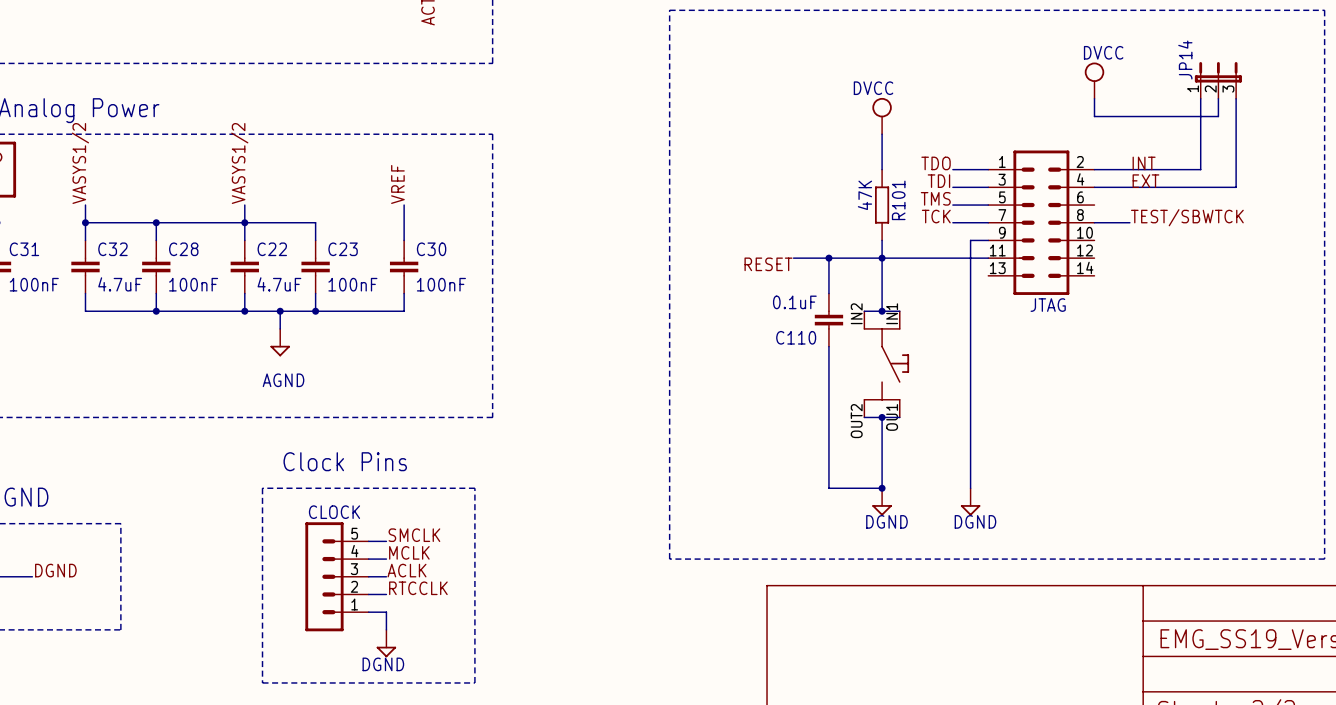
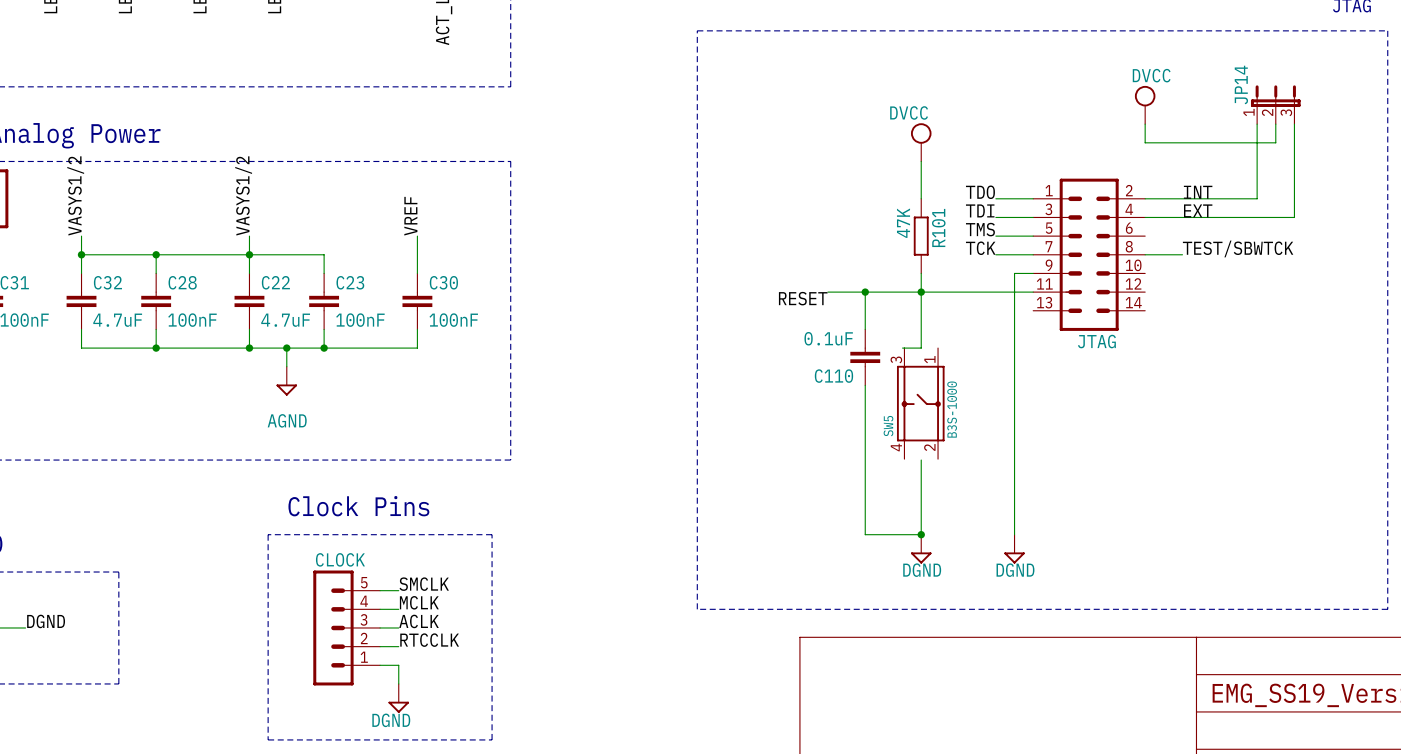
wire: (882, 311) (899, 311) -> none
junction: (882, 311) -> none
SW5: none -> B3S-1000 (920, 403)
part: (886, 364) -> none
wire: (864, 417) (899, 417) -> none
junction: (882, 417) -> none

